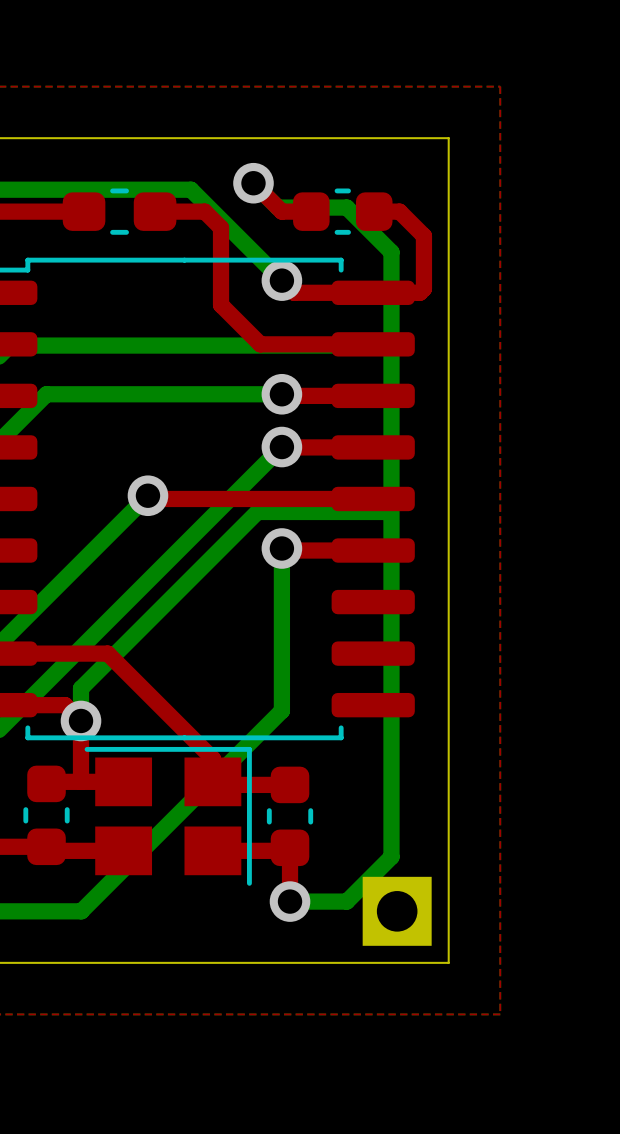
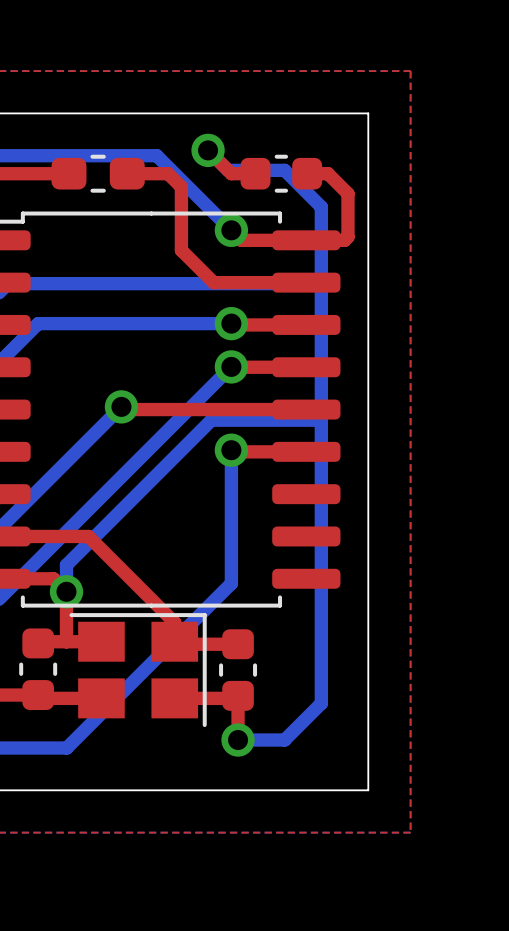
part: (397, 911) -> none

